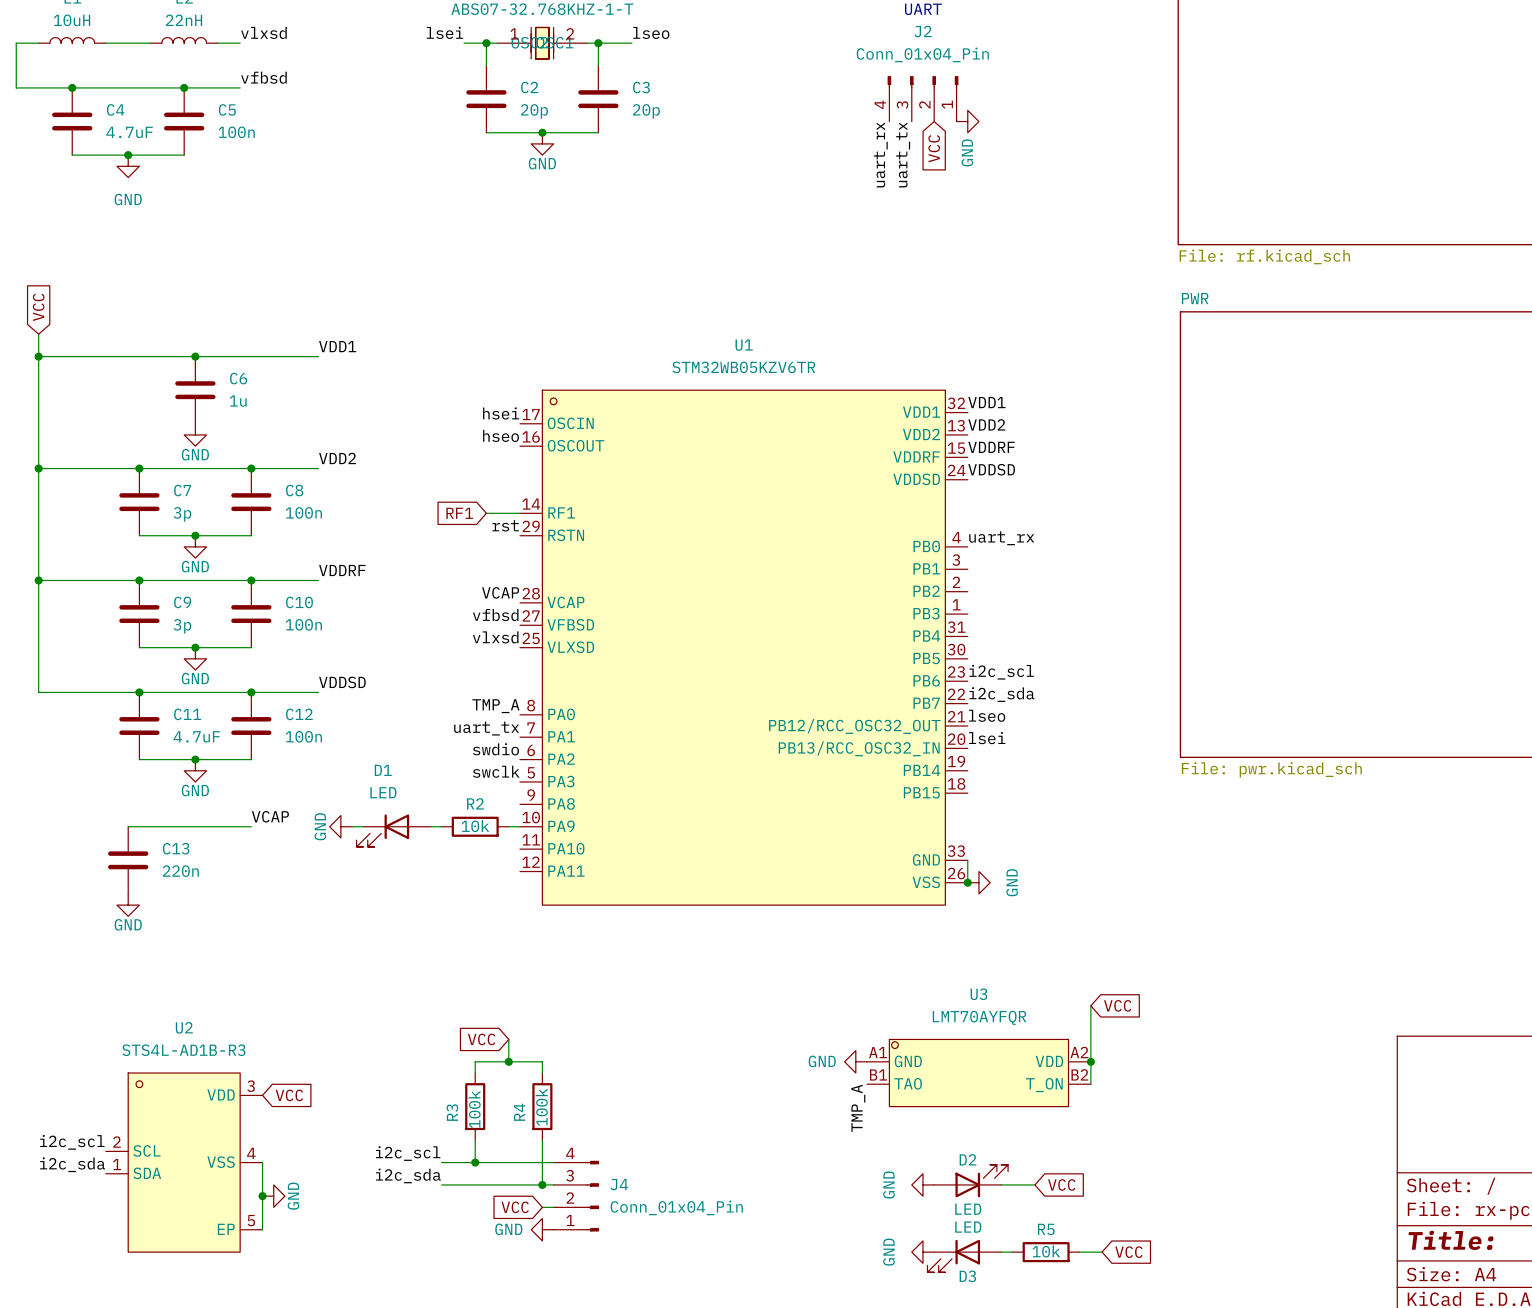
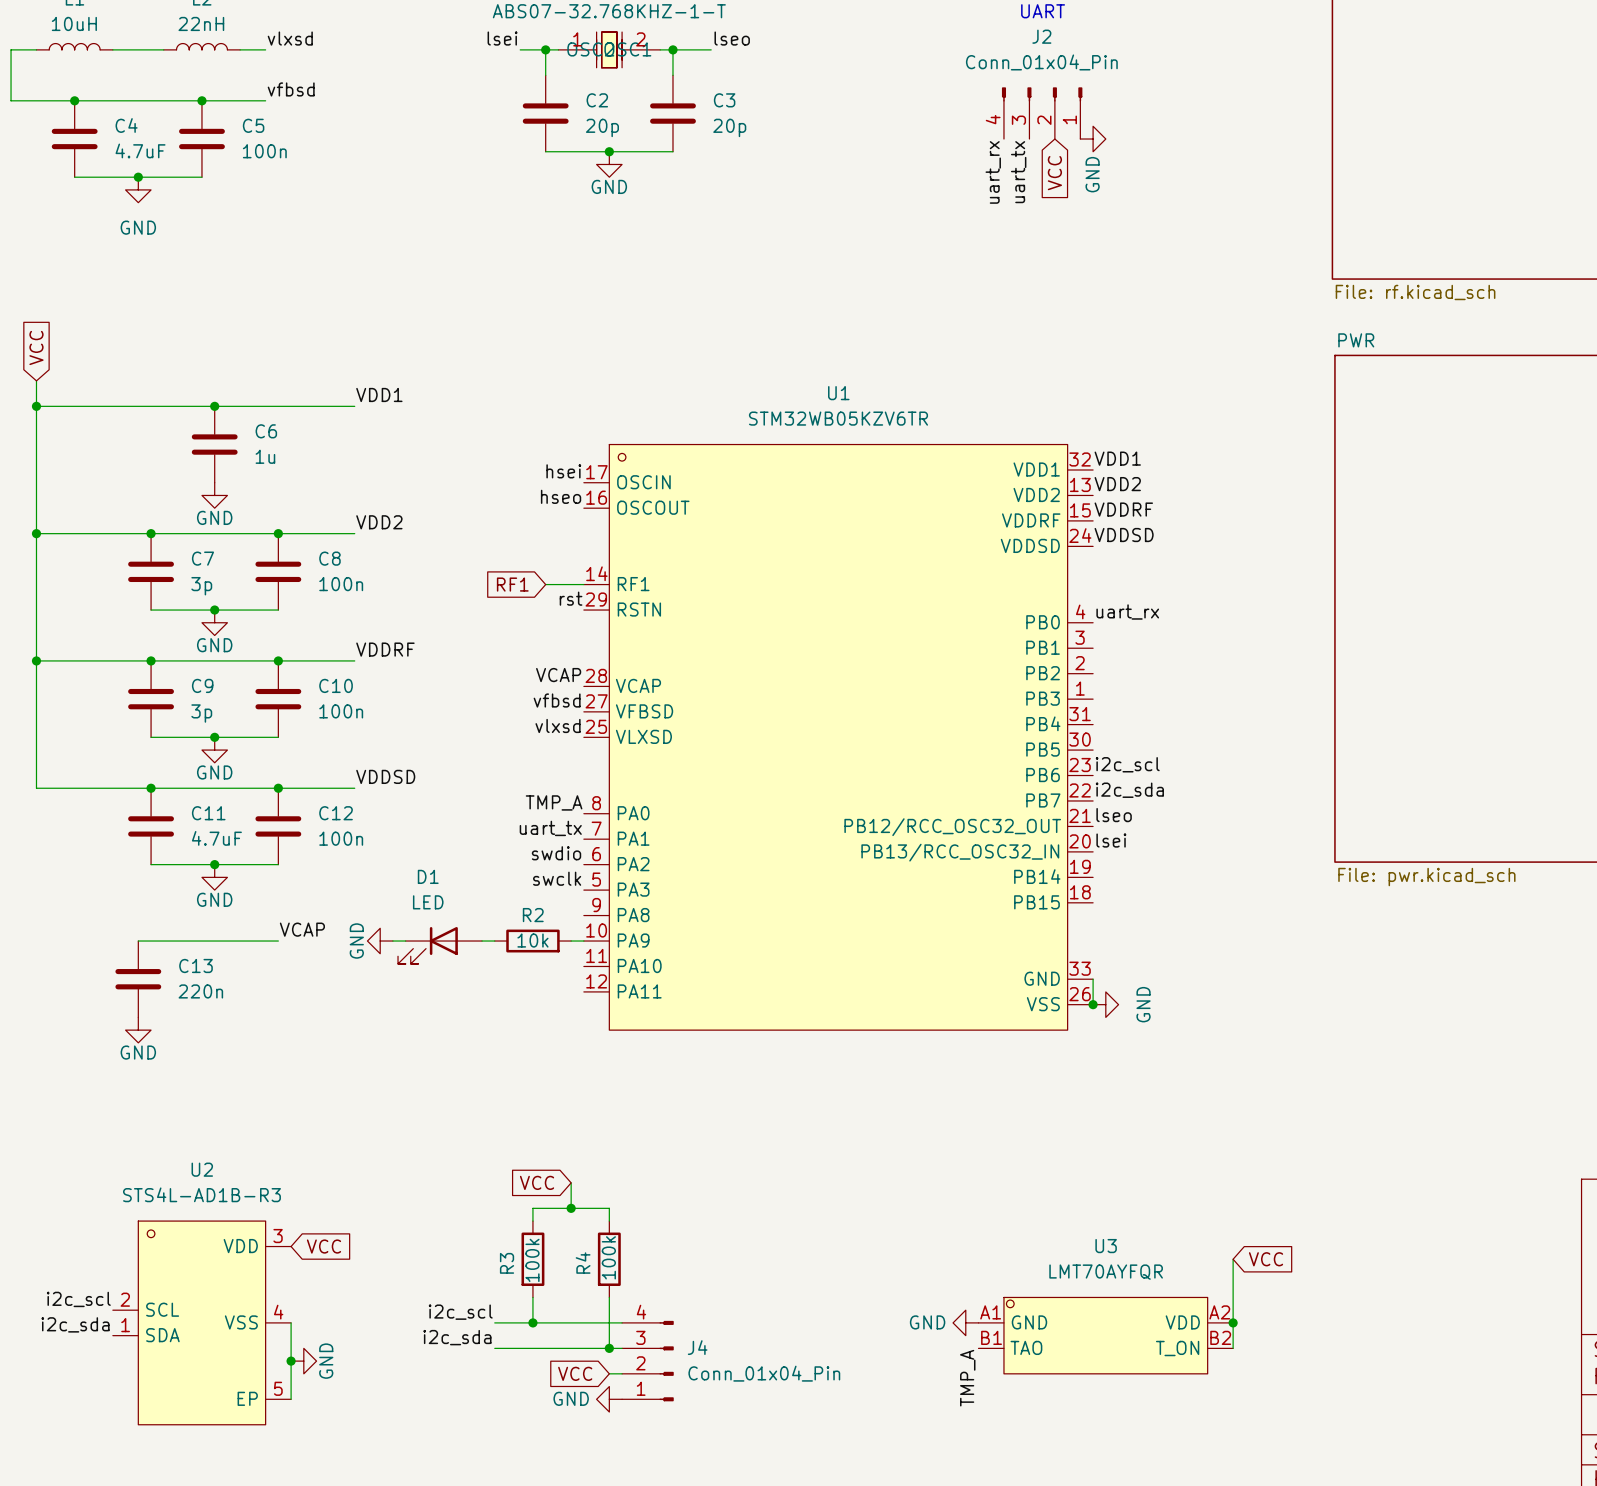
wire: (1090, 1005) (1090, 1084) -> (1233, 1259) (1233, 1348)
global label: VCC (1117, 1005) -> none
power symbol: GND (855, 1061) -> none
junction: (1090, 1061) -> none
U3 position: (978, 1073) -> (1105, 1335)
global label: none -> VCC (1266, 1259)
label position: TMP_A (858, 1108) -> TMP_A (967, 1378)
power symbol: none -> GND (965, 1322)
junction: none -> (1233, 1322)
D2: LED (971, 1181) -> none
power symbol: GND (922, 1184) -> none
global label: VCC (1061, 1184) -> none
power symbol: GND (922, 1252) -> none
wire: (1001, 1252) (1012, 1252) -> none
R5: 10k (1046, 1252) -> none
wire: (1079, 1252) (1102, 1252) -> none
global label: VCC (1128, 1252) -> none
D3: LED (964, 1256) -> none

